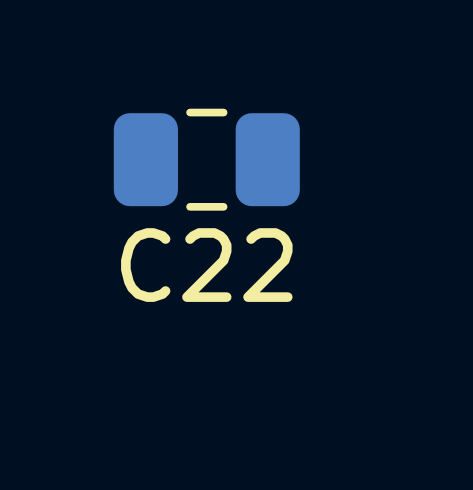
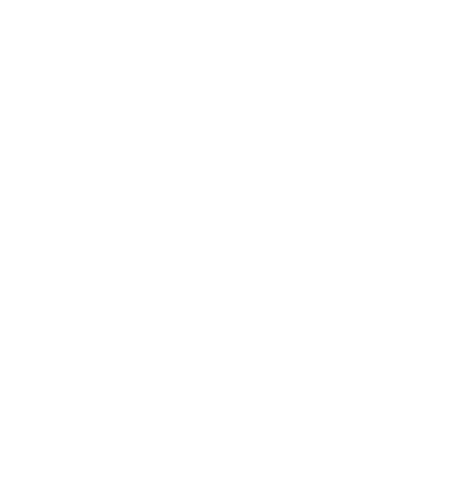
C22: (206, 159) -> none

